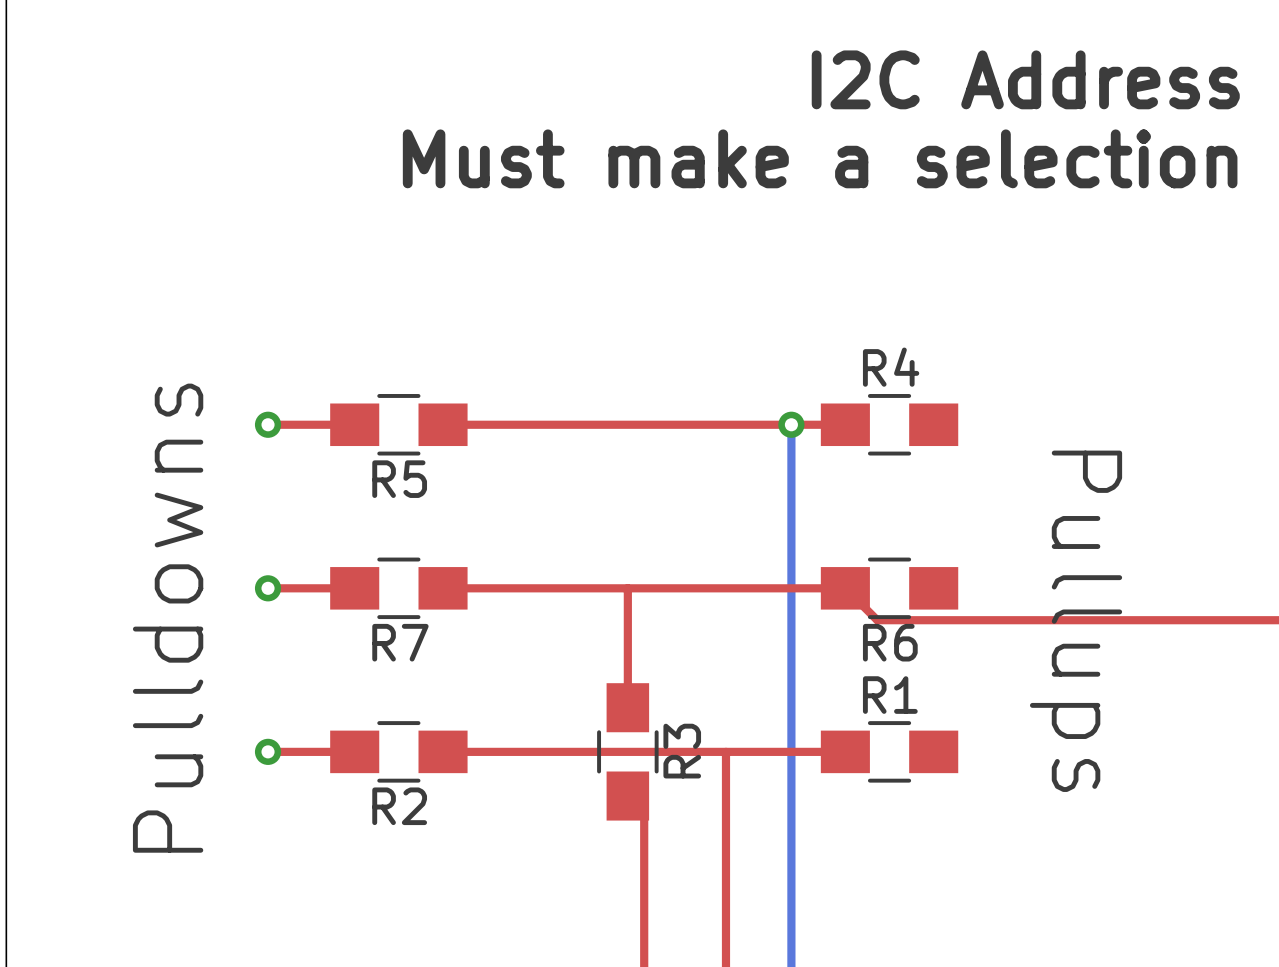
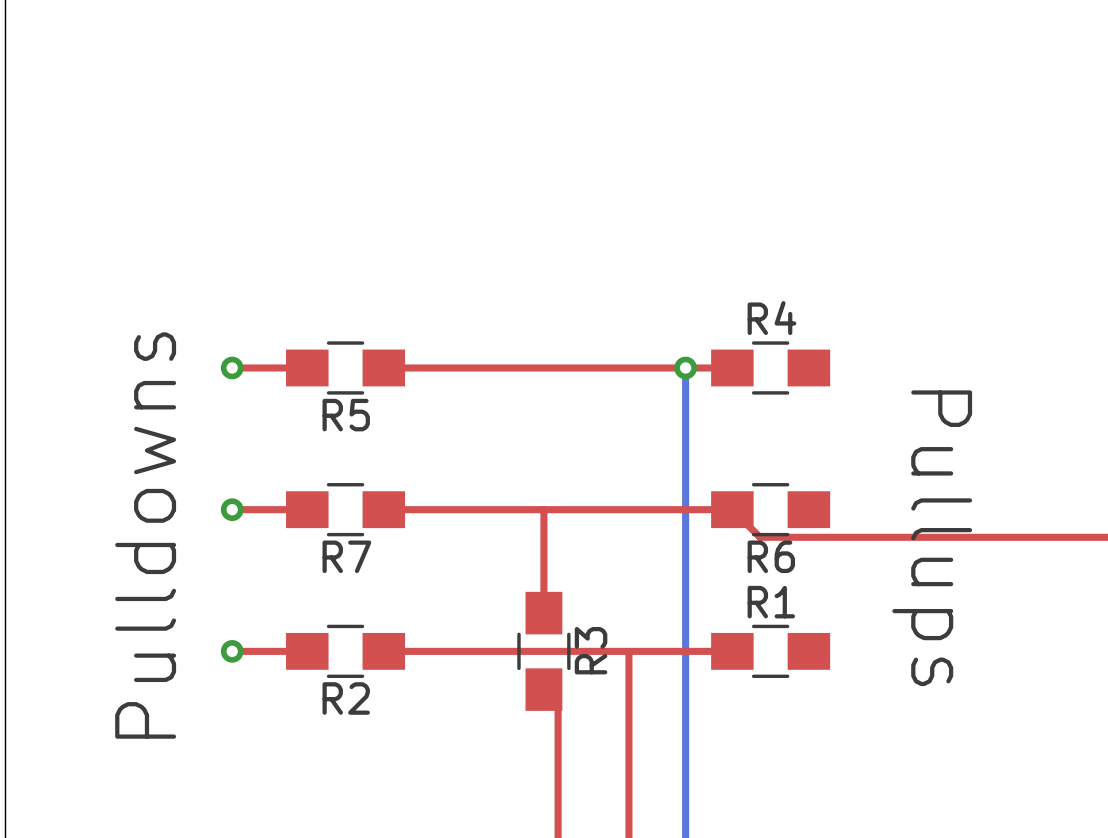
text: I2C Address (1025, 79) -> none
text: Must make a selection (820, 158) -> none

